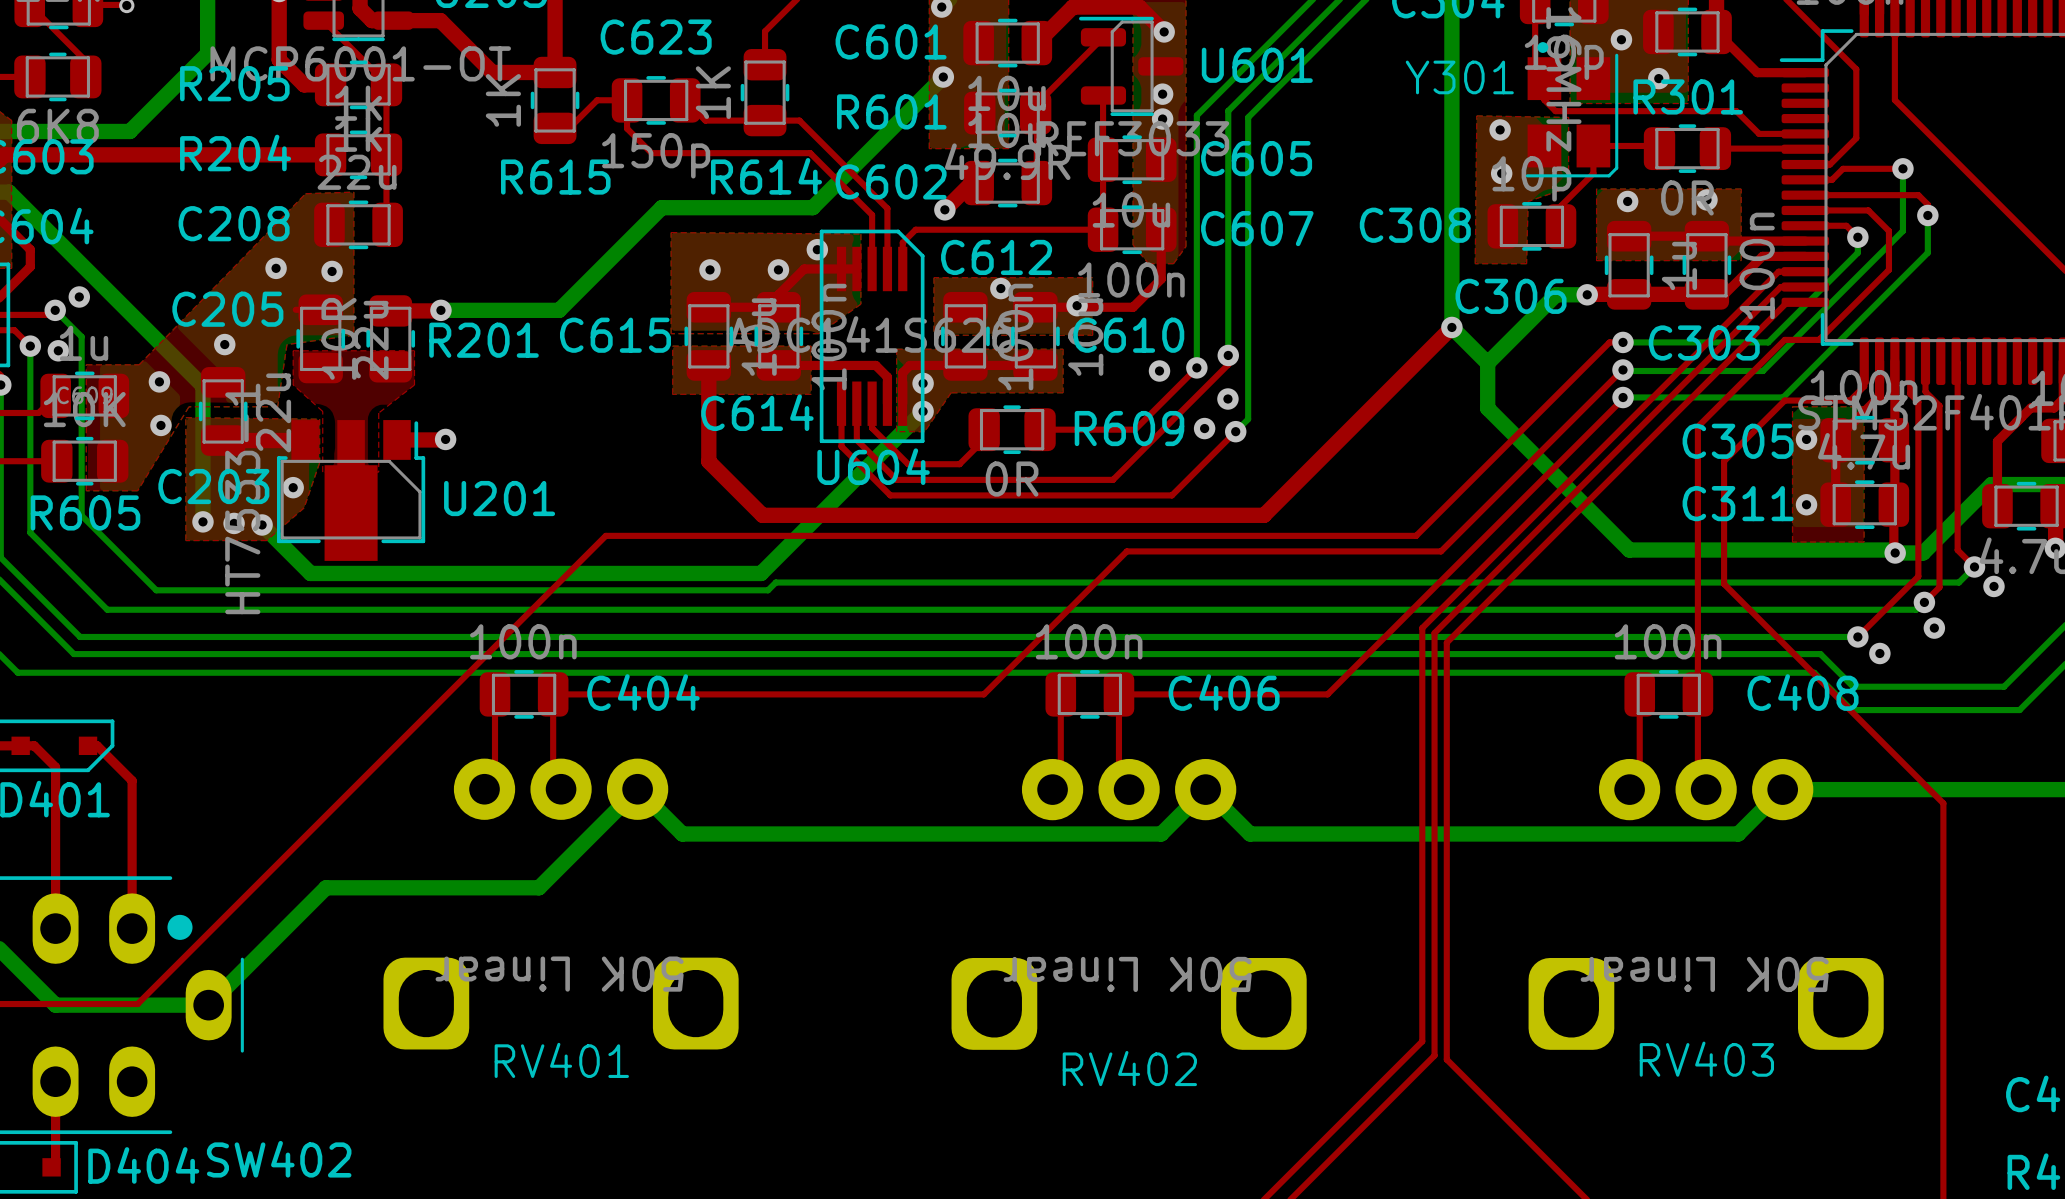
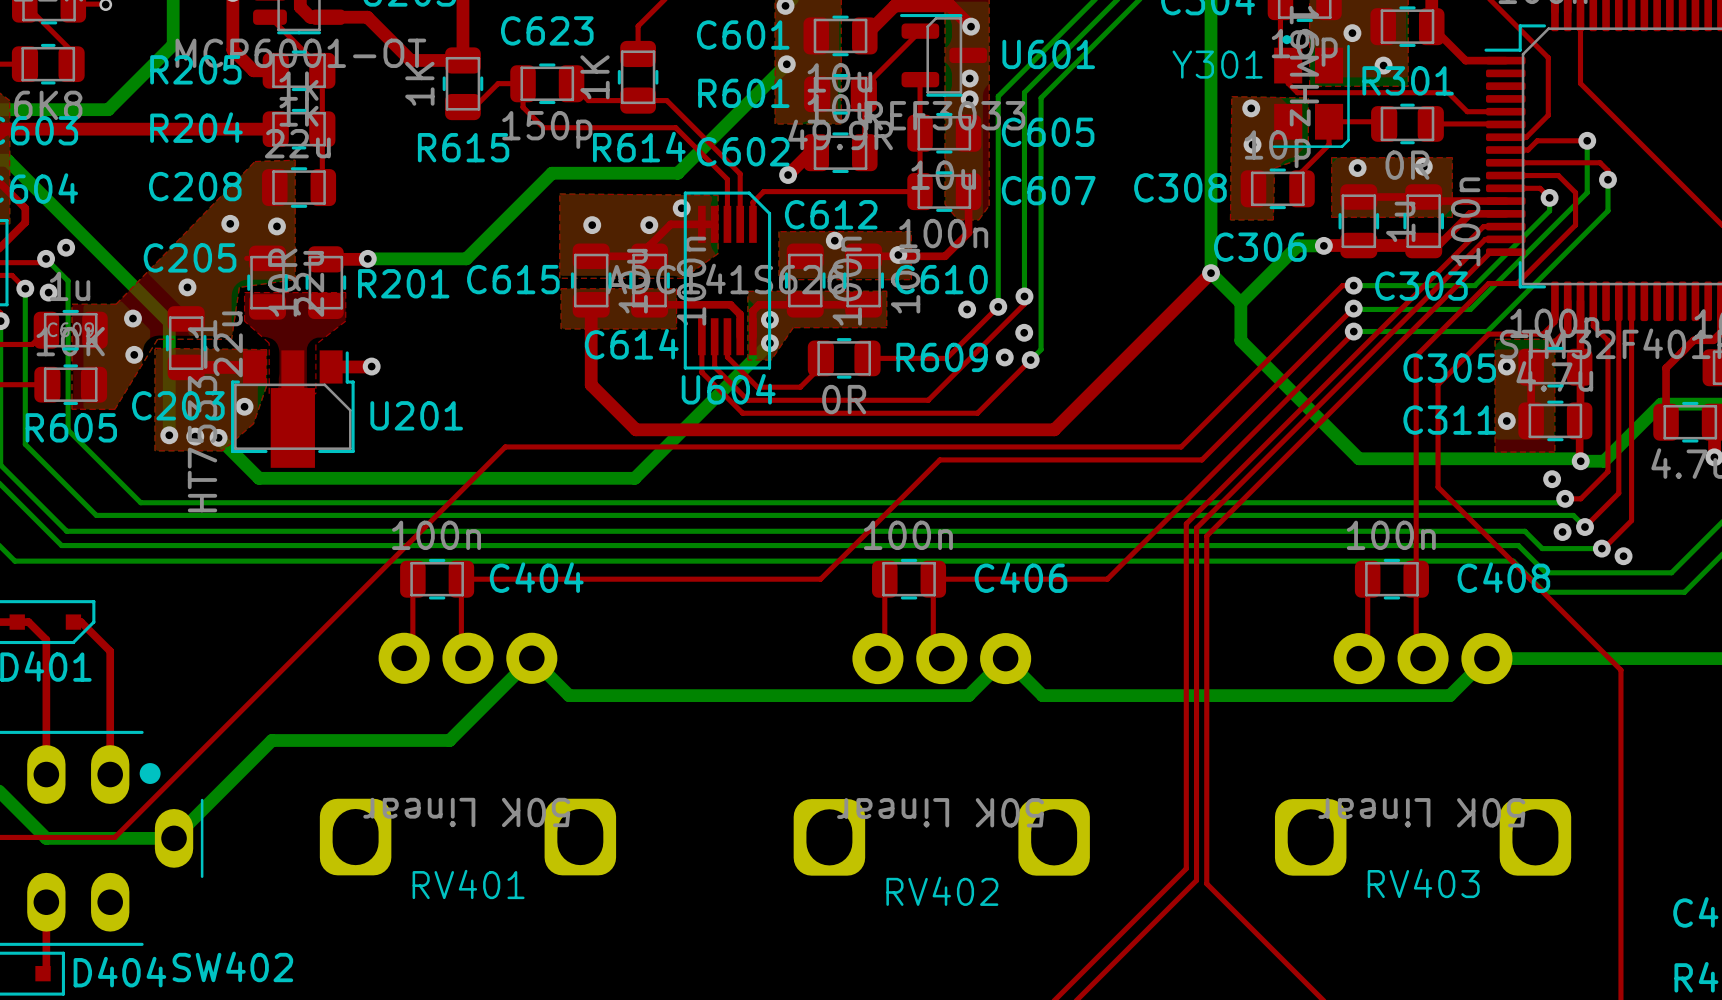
top track: (1925, 361) (1925, 391) (1939, 405) (1939, 587) (1924, 602) -> none
top track: none -> (1618, 301) (1618, 493) (1585, 527)
top track: (1956, 361) (1957, 362) (1957, 550) (1974, 566) -> (1631, 301) (1631, 520) (1601, 548)
top track: (1910, 390) (1910, 393) (1918, 401) (1918, 576) (1857, 636) -> (1593, 325) (1607, 340) (1607, 471) (1580, 498) (1565, 498)
bottom track: (1974, 566) (1958, 582) (775, 582) (768, 590) (156, 590) -> (1565, 498) (1561, 502) (140, 502) (130, 492)
via: (1974, 566) -> none
via: none -> (1552, 479)
via: (1993, 586) -> none
via: none -> (1565, 498)
bottom track: (1924, 602) (1916, 609) (107, 609) -> (1585, 527) (1573, 515) (96, 515) (89, 508)
via: (1924, 602) -> none
via: (1934, 628) -> none
via: none -> (1585, 527)
bottom track: (1828, 636) (1857, 636) -> (1524, 531) (1542, 548) (1601, 548)
via: (1857, 636) -> none
via: none -> (1562, 532)
via: (1879, 653) -> none
via: none -> (1601, 548)
via: none -> (1623, 556)

